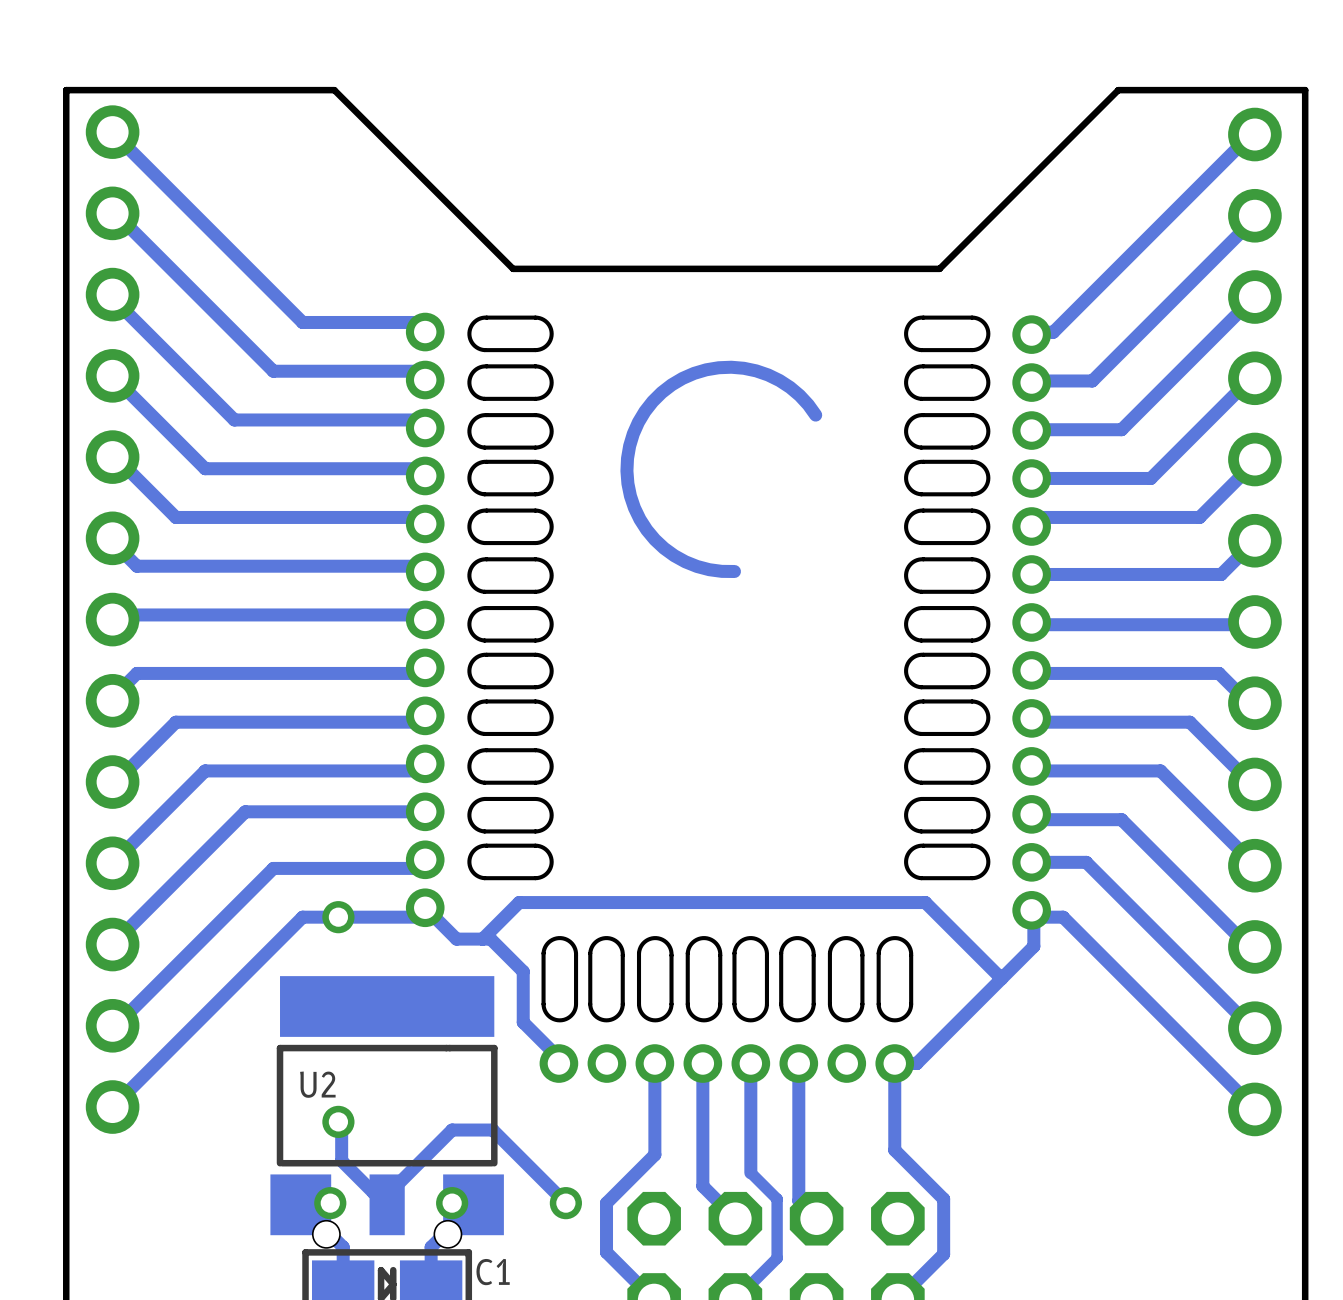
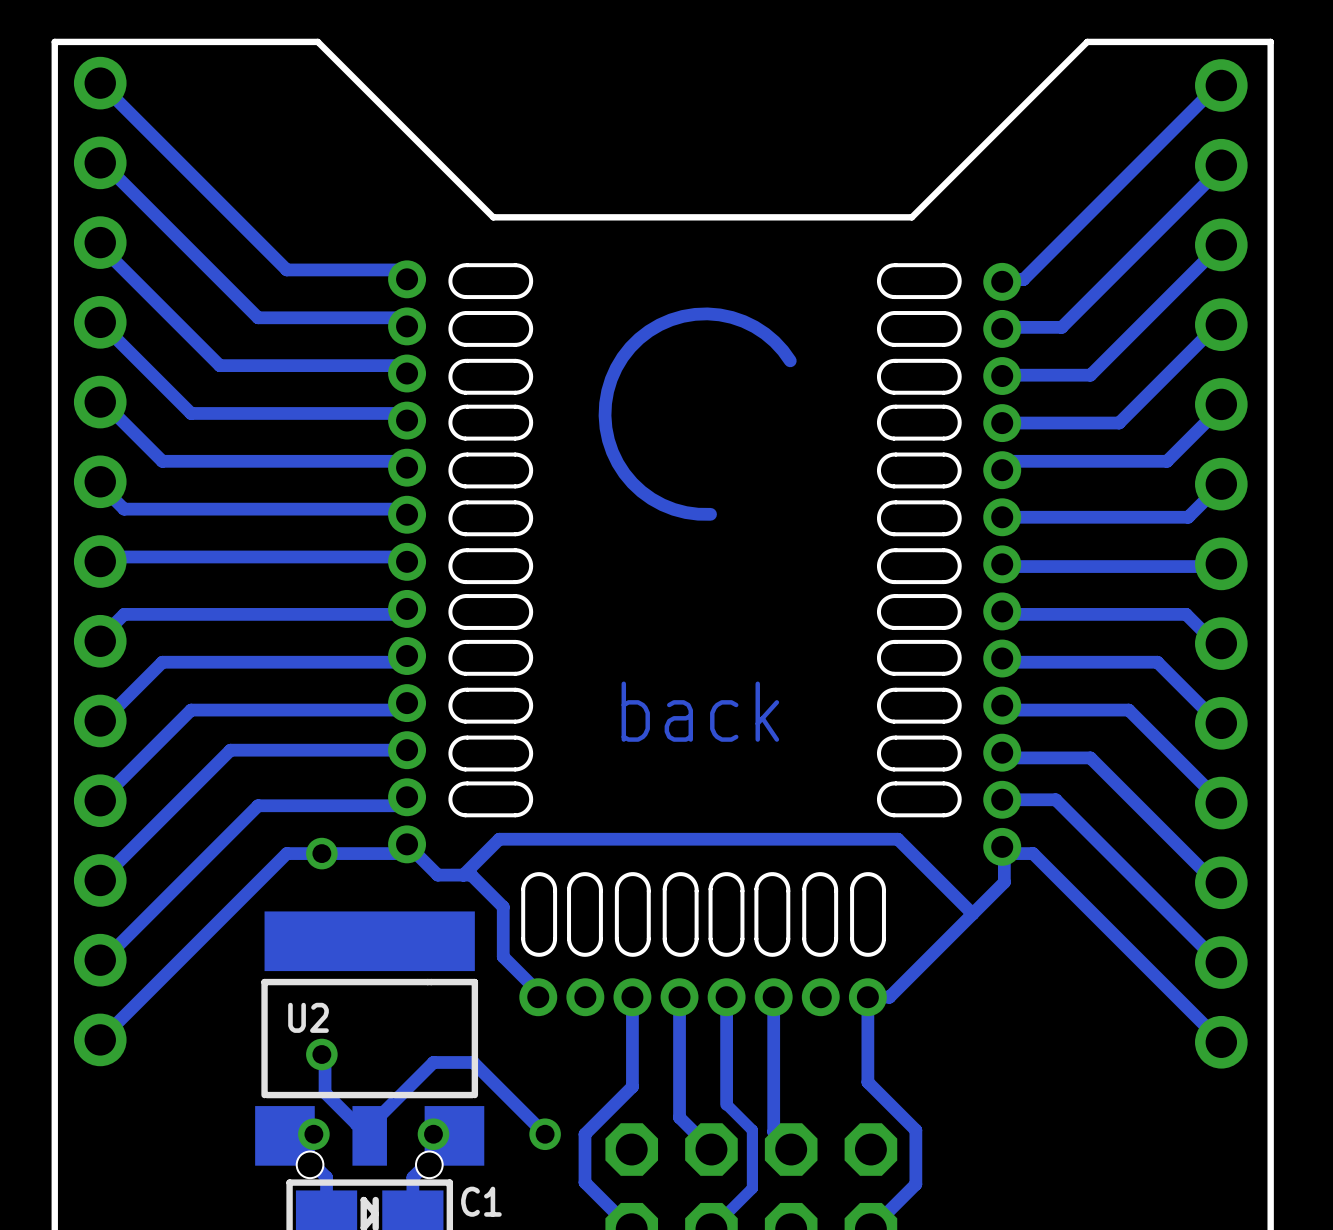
text: none -> back (700, 711)

